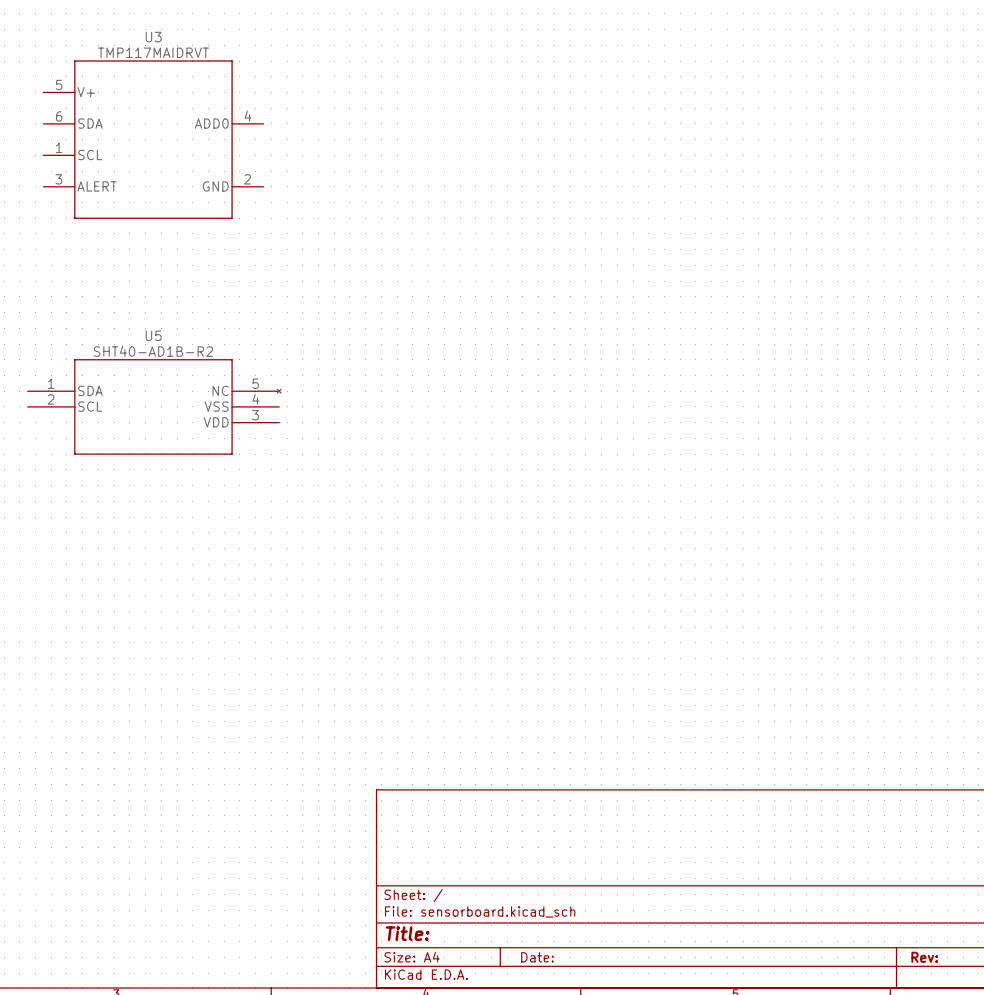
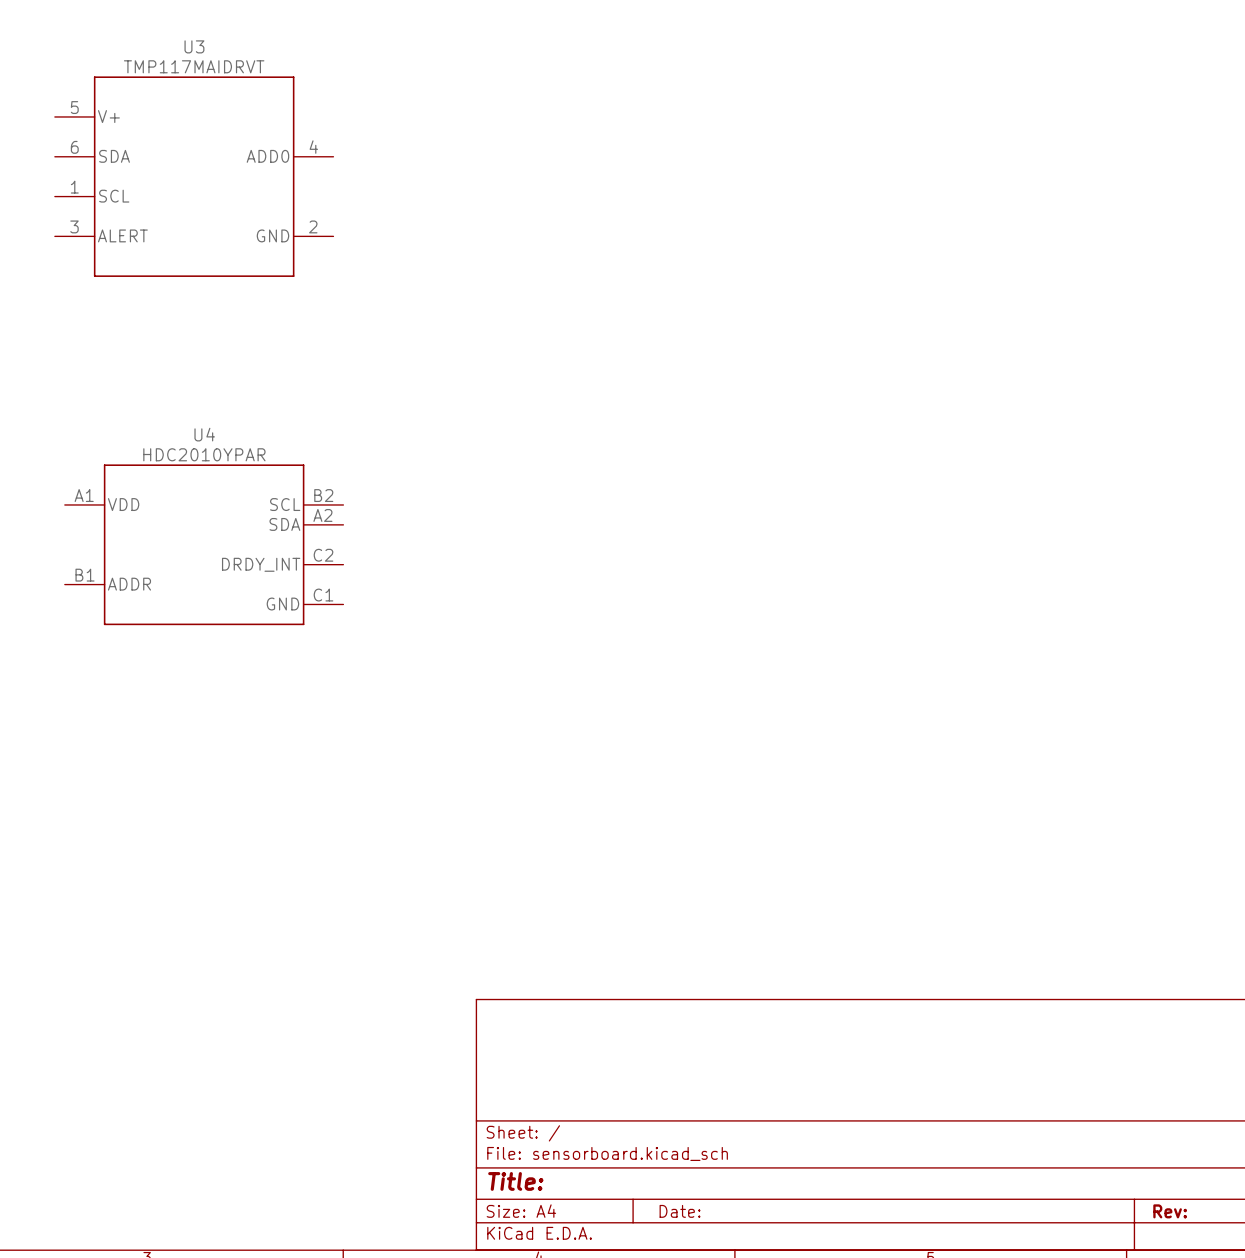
U5: SHT40-AD1B-R2 (154, 406) -> none
U4: none -> HDC2010YPAR (204, 544)

